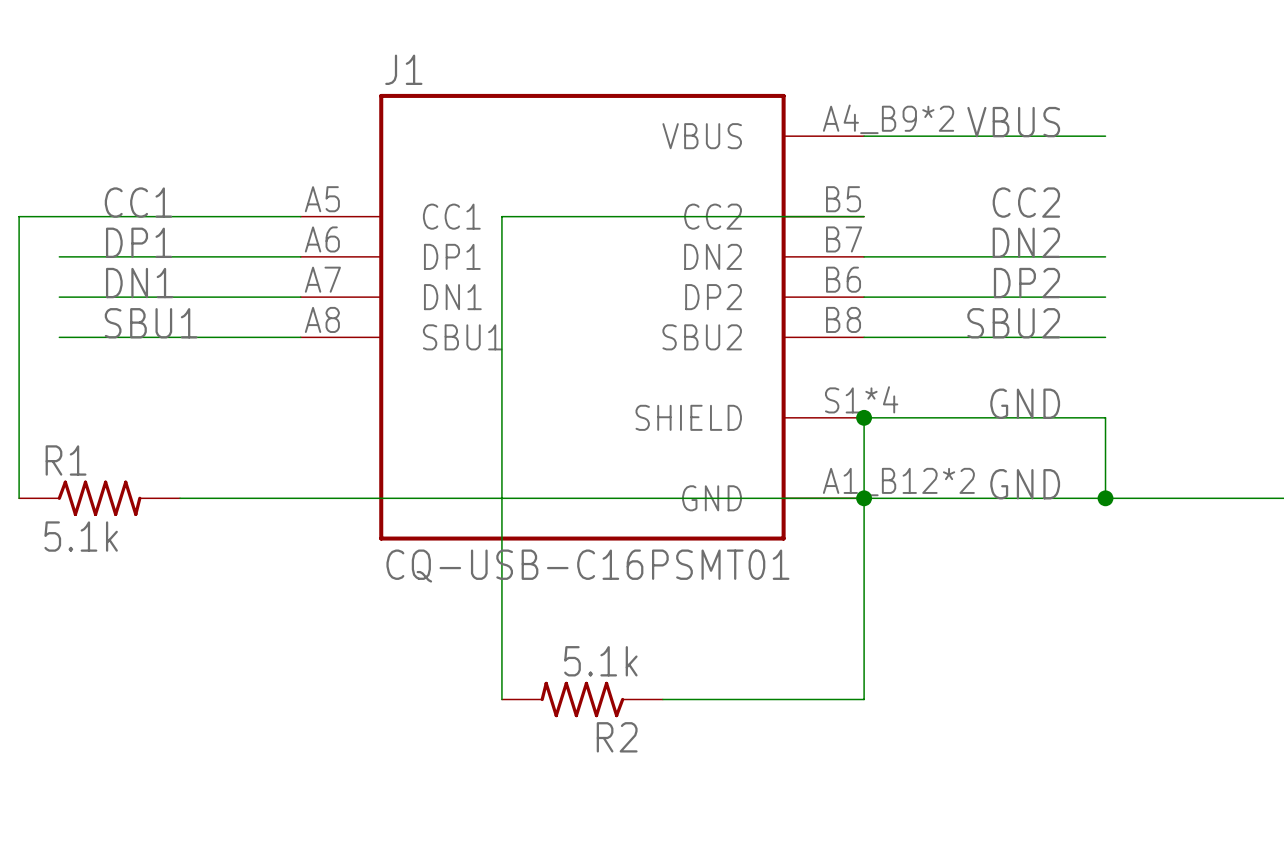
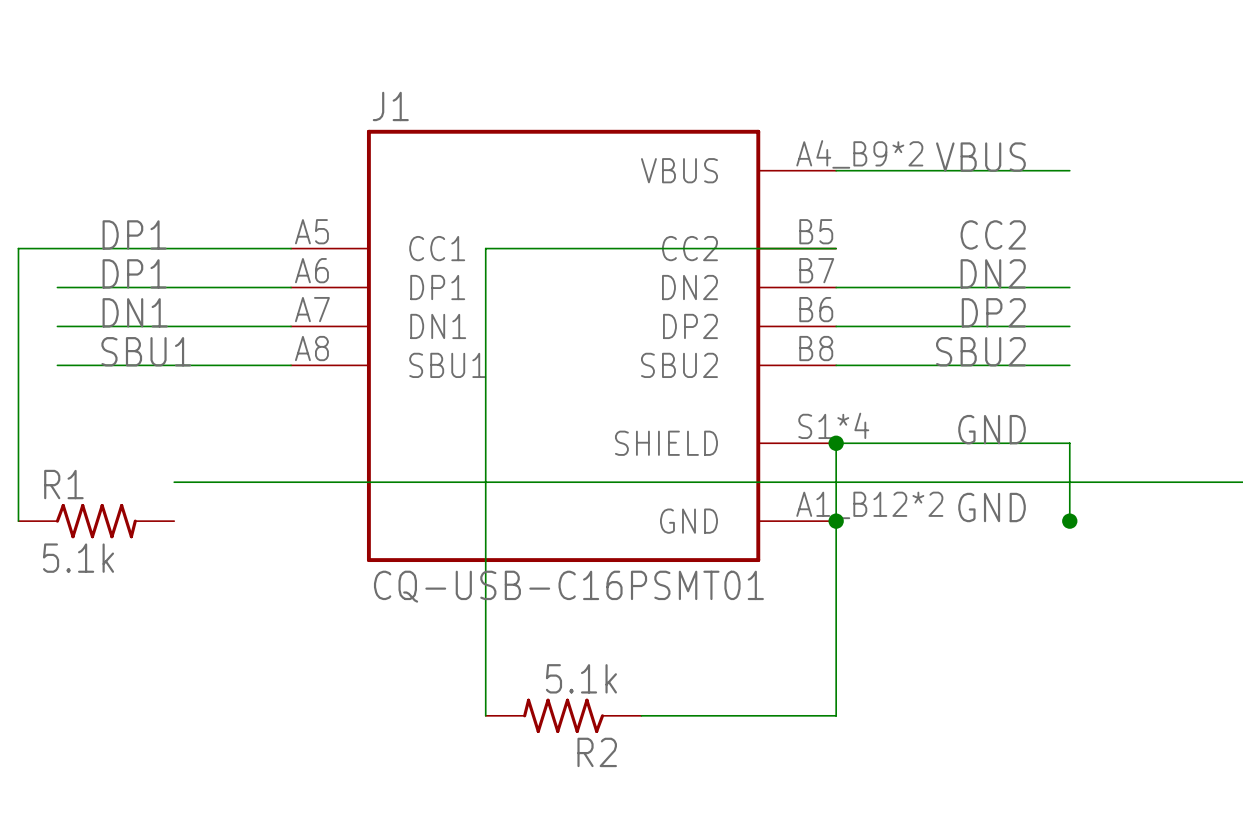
label position: VBUS (1013, 122) -> VBUS (980, 157)
wire: (864, 136) (1105, 136) -> (836, 170) (1069, 170)
label: CC1 (138, 202) -> none
label: CC2 (1026, 202) -> none
wire: (300, 216) (19, 216) (19, 256) -> (57, 248) (18, 248)
wire: (864, 216) (501, 216) (501, 256) -> (836, 248) (485, 248)
label: DN2 (1026, 242) -> CC2 (993, 234)
wire: (864, 256) (1105, 256) -> (836, 365) (1069, 365)
label: DN1 (139, 283) -> DP1 (134, 273)
label: DP2 (1026, 283) -> DN2 (993, 273)
J1 position: (582, 317) -> (563, 345)
label: SBU1 (151, 323) -> DN1 (135, 312)
label: SBU2 (1013, 323) -> DP2 (993, 312)
label: none -> SBU1 (146, 351)
label: none -> SBU2 (980, 351)
wire: none -> (57, 365) (291, 365)
label: GND (1025, 403) -> none
junction: (864, 417) -> none
label: none -> GND (992, 429)
wire: (864, 458) (864, 417) (1105, 417) (1105, 458) -> (836, 443) (1069, 443)
junction: none -> (836, 443)
label: GND (1025, 484) -> none
wire: none -> (18, 482) (18, 521)
R1 position: (99, 498) -> (96, 521)
junction: (864, 498) -> none
wire: none -> (1069, 482) (1069, 521)
junction position: (1105, 498) -> (1069, 521)
label: none -> GND (992, 507)
junction: none -> (836, 521)
wire: none -> (485, 676) (485, 715)
R2 position: (582, 699) -> (563, 715)
wire: (662, 699) (864, 699) -> (641, 715) (836, 715) (836, 676)

